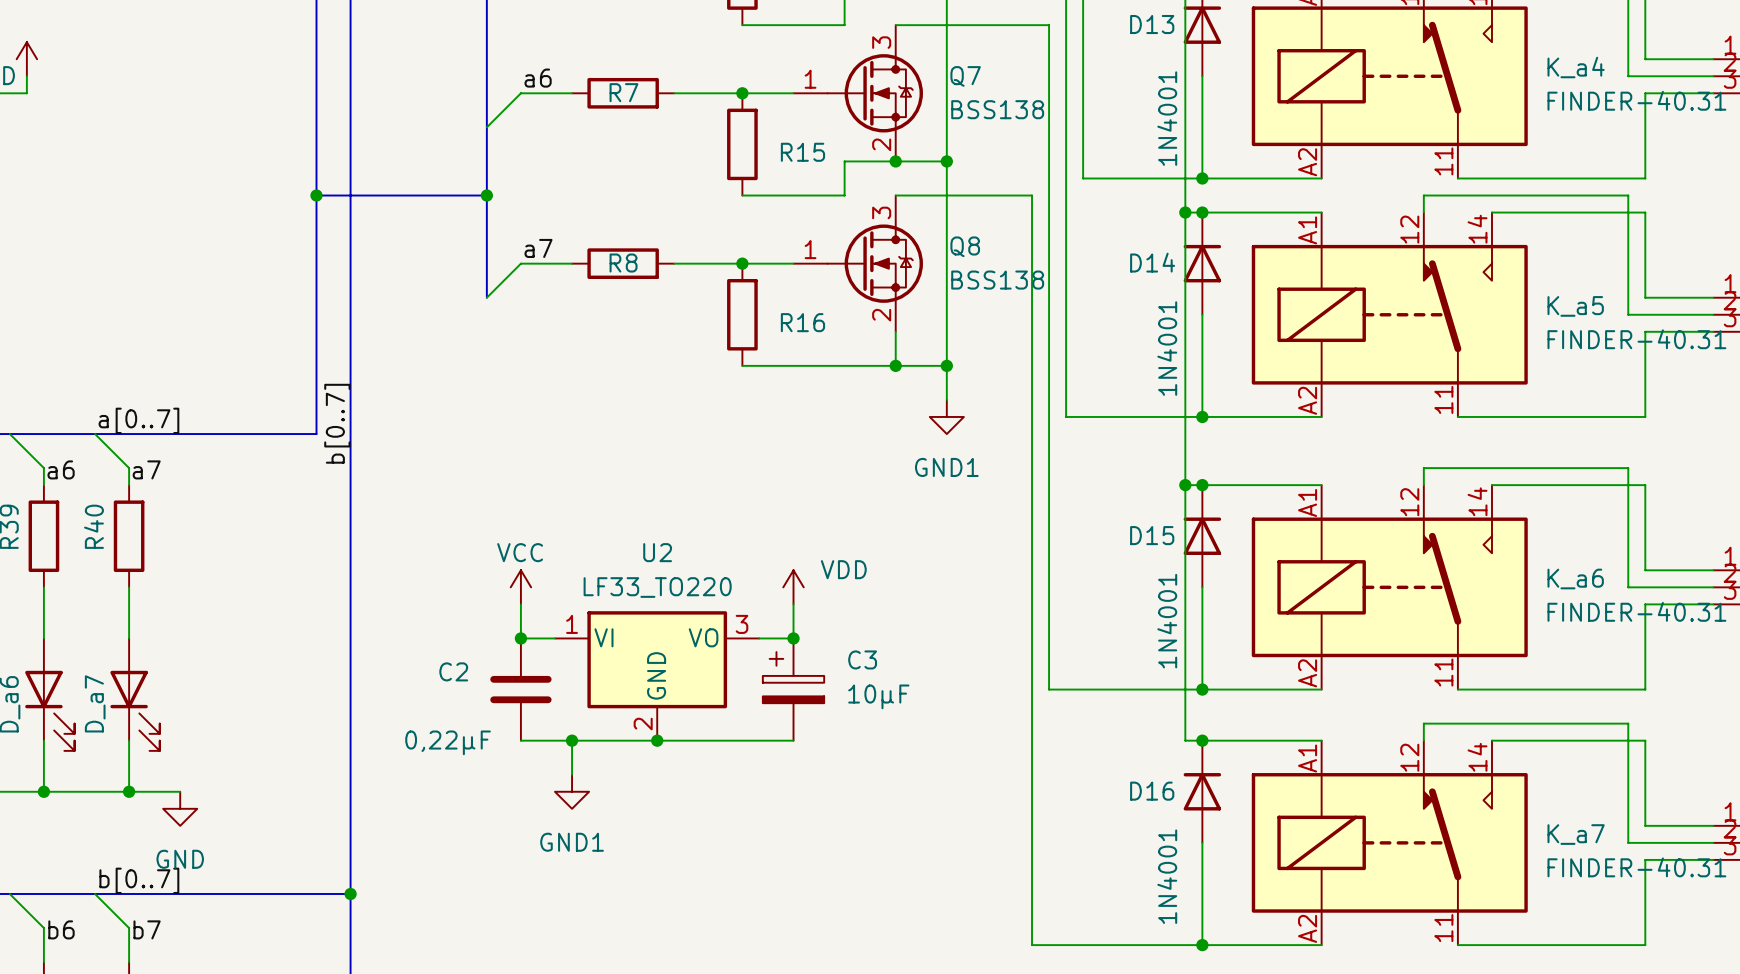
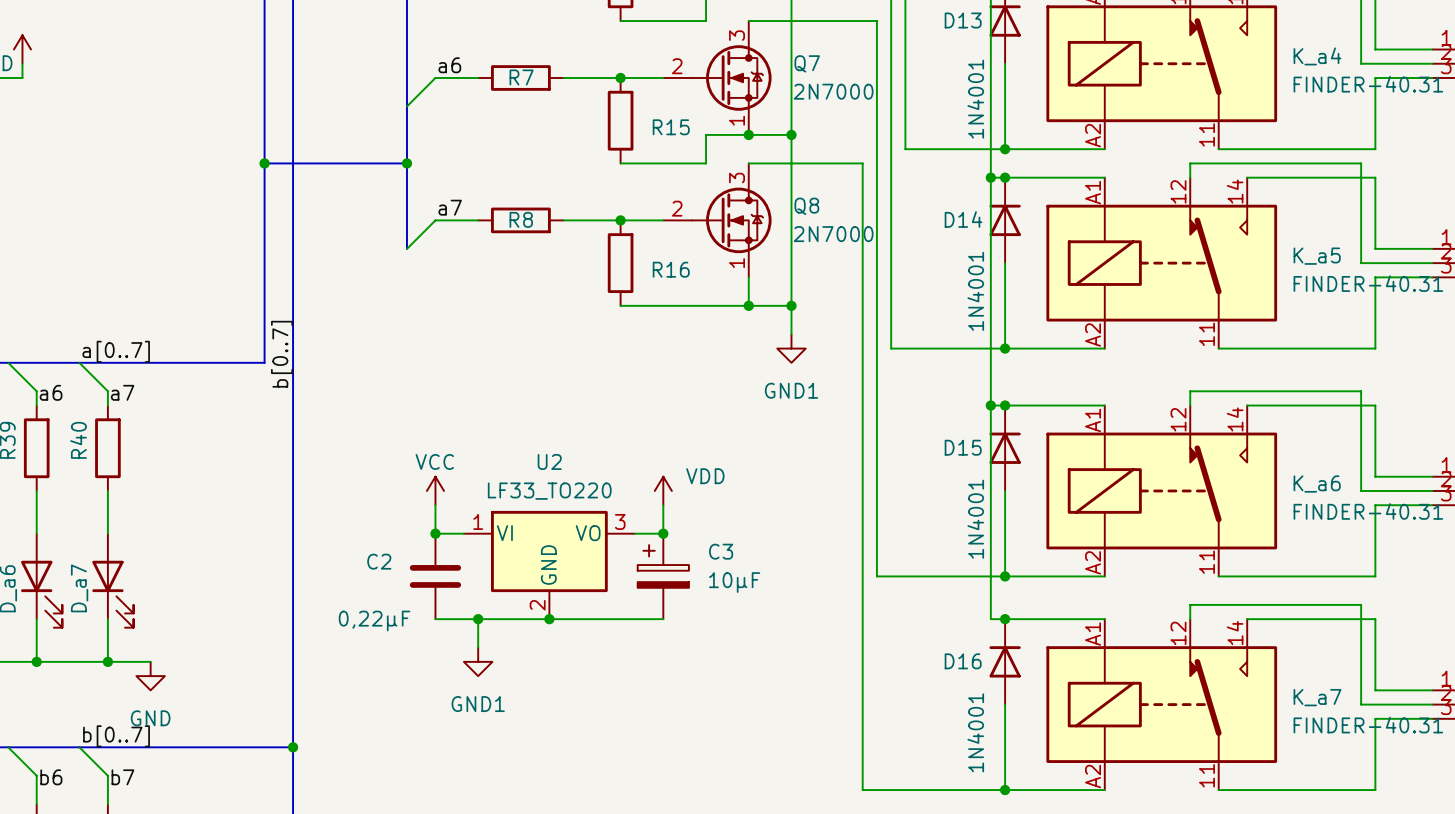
Q7 pin number: 1 (810, 79) -> 2 (677, 66)
Q7 value: BSS138 (997, 109) -> 2N7000 (833, 91)
Q7 pin number: 2 (881, 144) -> 1 (737, 120)
Q8 pin number: 1 (810, 249) -> 2 (677, 208)
Q8 value: BSS138 (997, 280) -> 2N7000 (833, 234)
Q8 pin number: 2 (881, 315) -> 1 (737, 263)

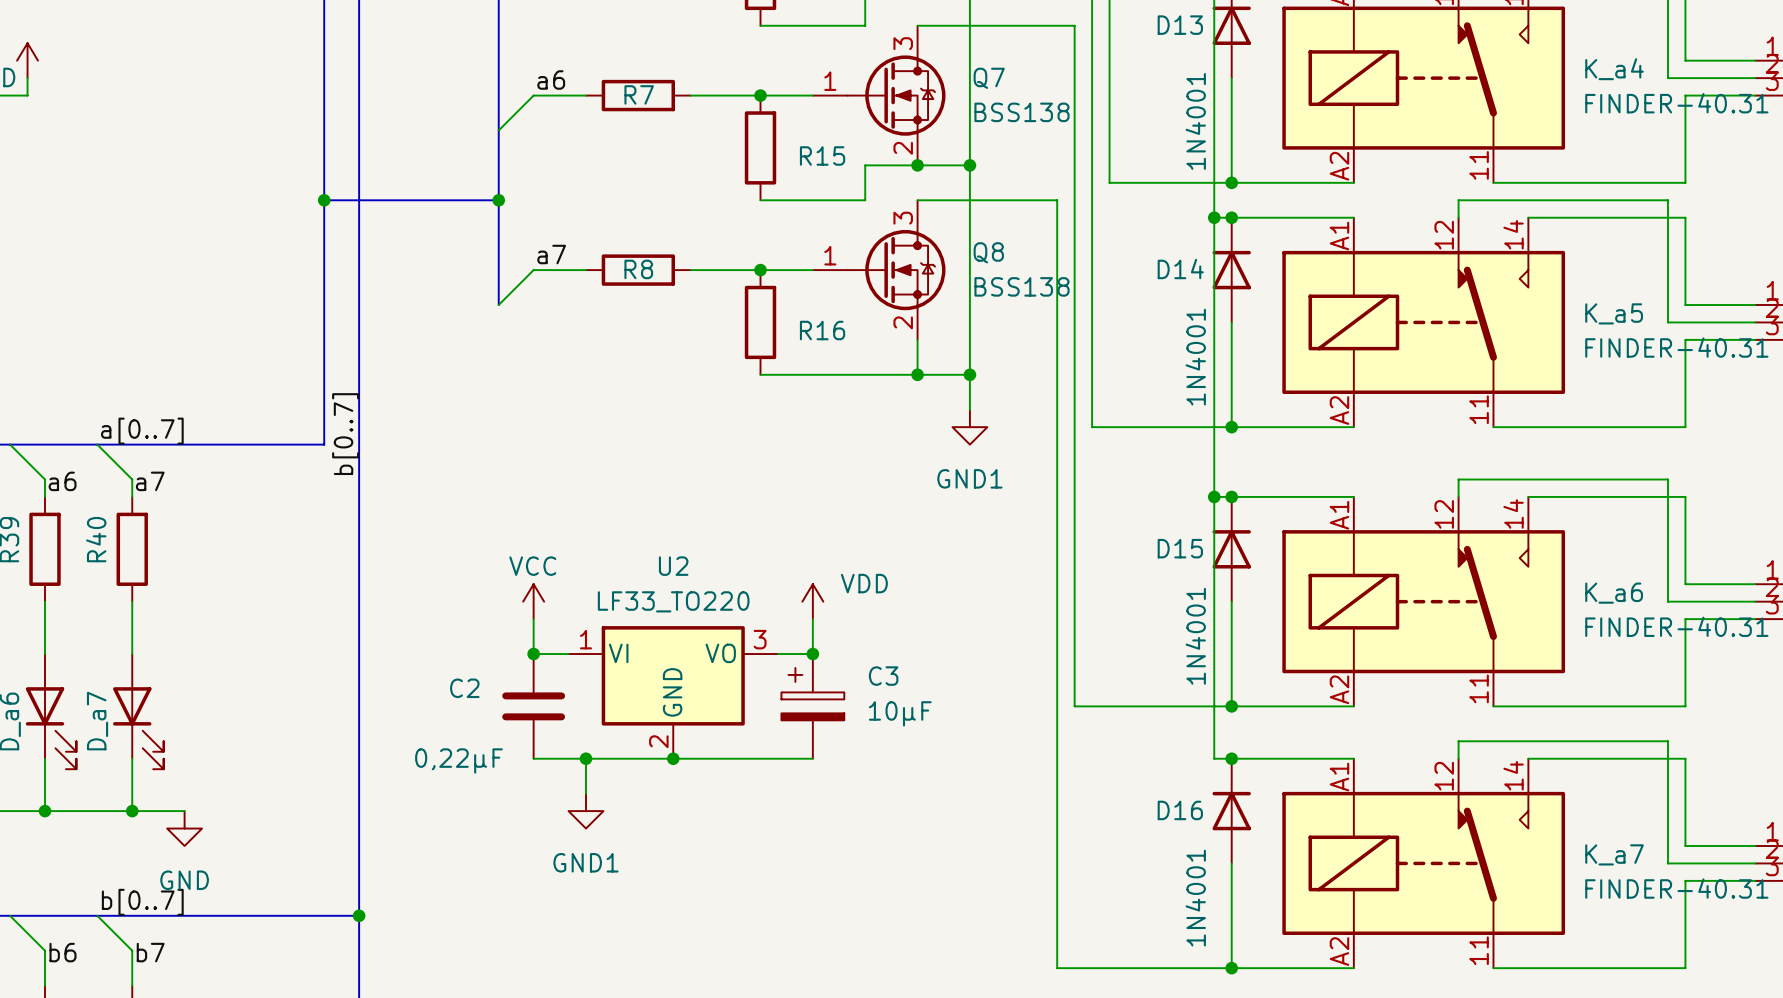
Q7 pin number: 2 (677, 66) -> 1 (830, 81)
Q7 value: 2N7000 (833, 91) -> BSS138 (1022, 112)
Q7 pin number: 1 (737, 120) -> 2 (903, 148)
Q8 pin number: 2 (677, 208) -> 1 (830, 255)
Q8 value: 2N7000 (833, 234) -> BSS138 (1022, 286)
Q8 pin number: 1 (737, 263) -> 2 (903, 322)

